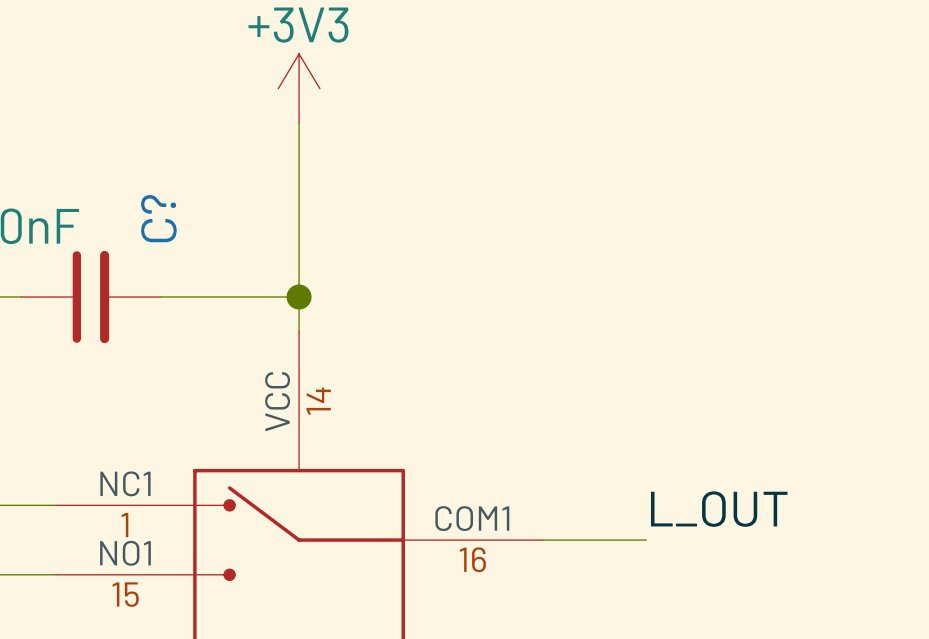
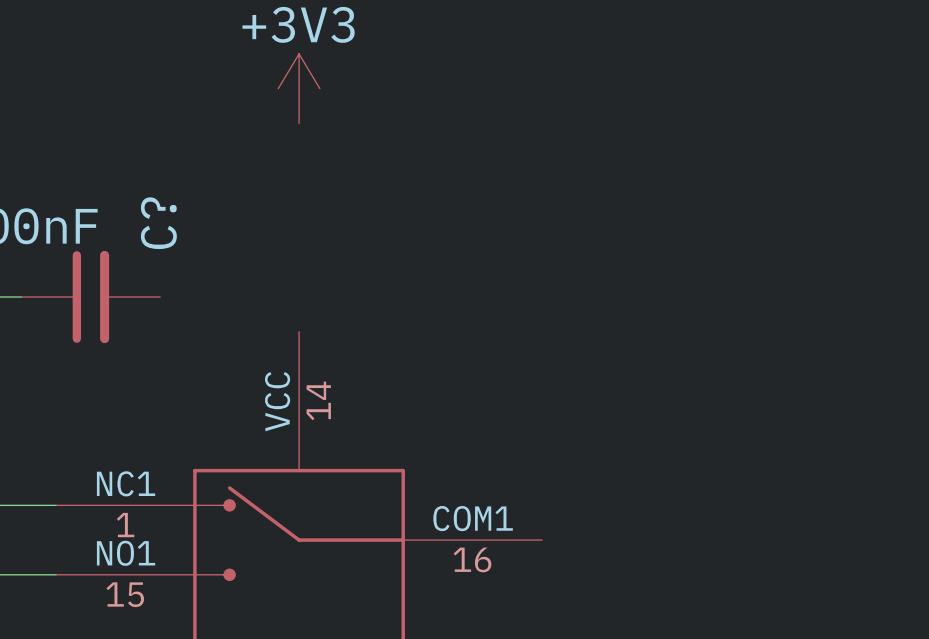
wire: (299, 123) (299, 331) -> none
wire: (160, 297) (299, 297) -> none
junction: (299, 297) -> none
label: L_OUT (719, 509) -> none
wire: (542, 540) (646, 540) -> none

